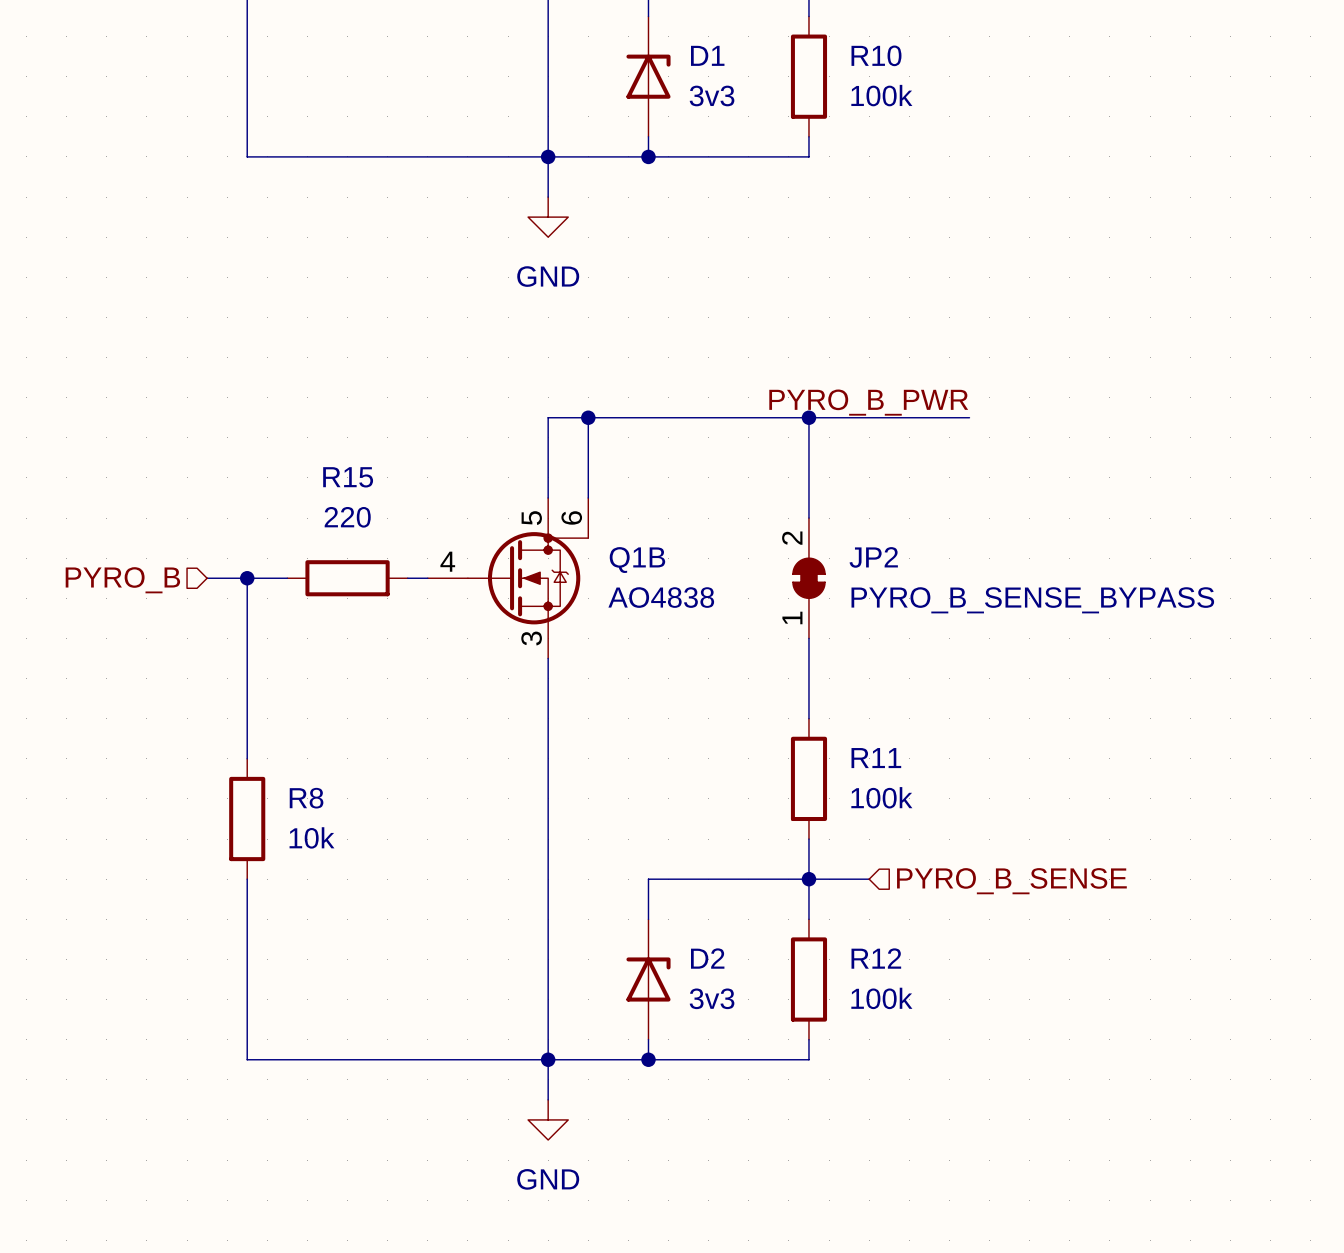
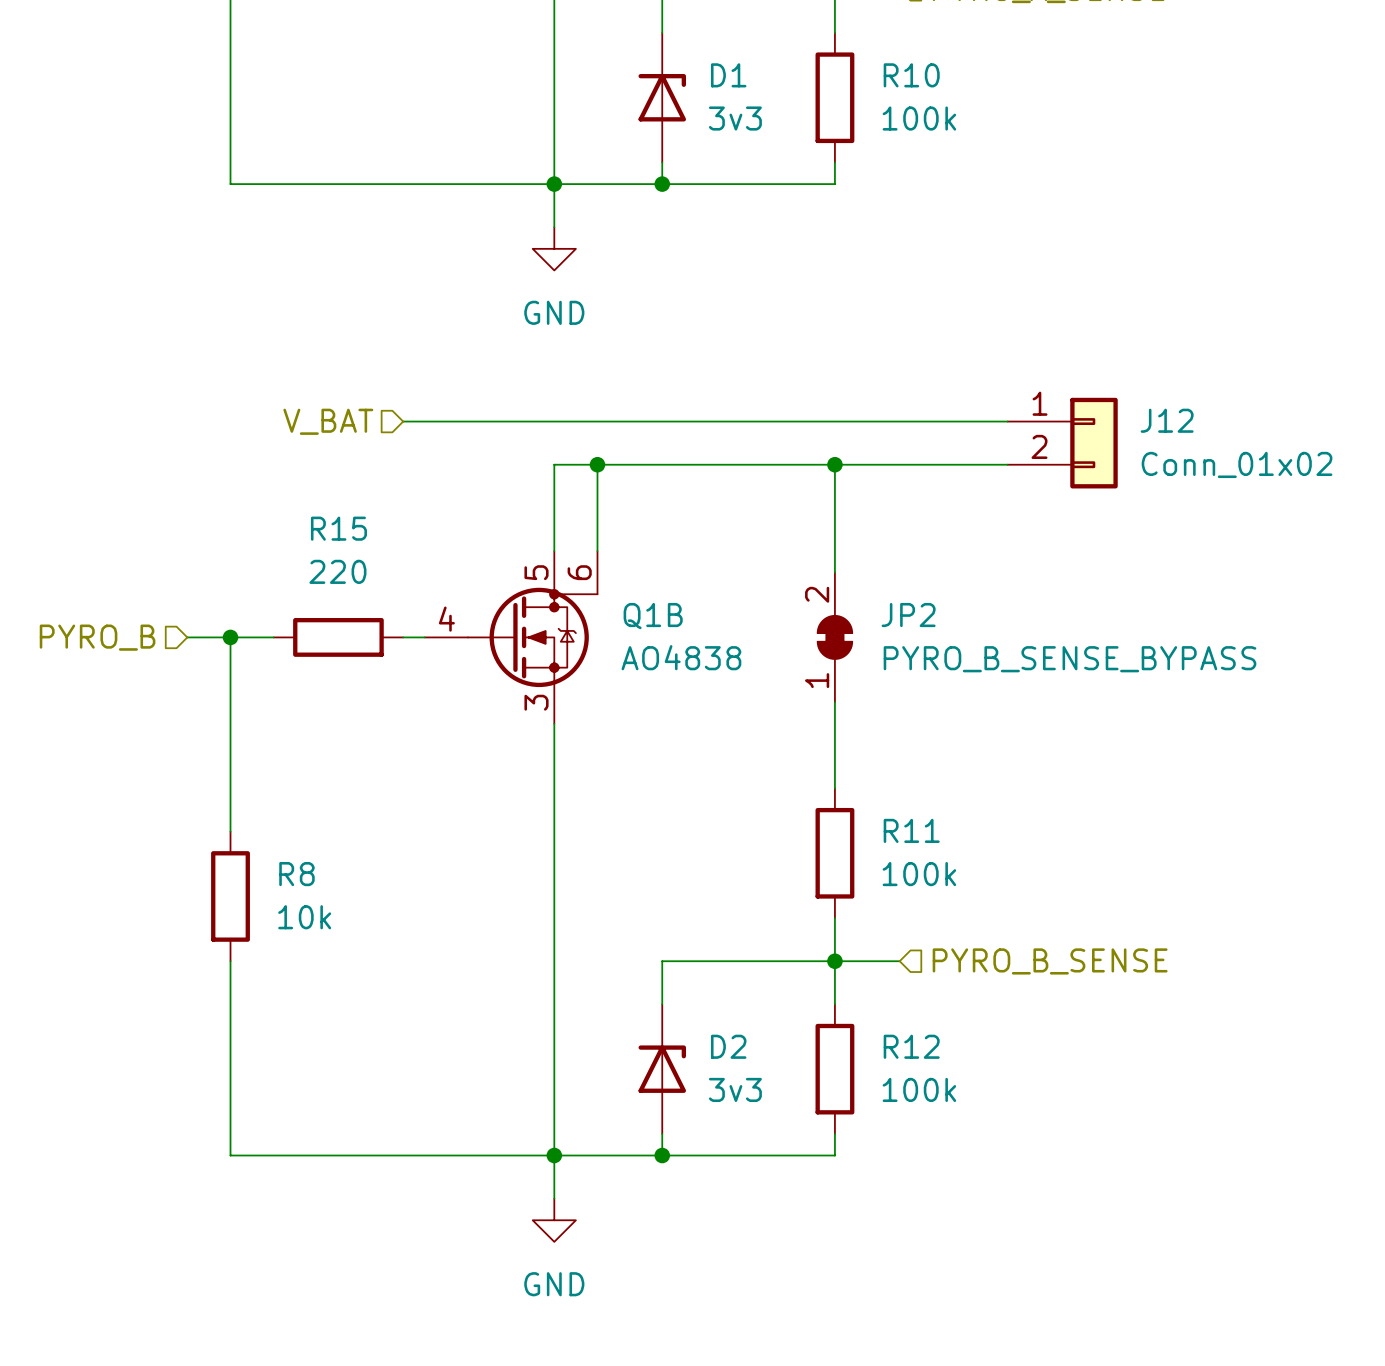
wire: none -> (403, 421) (1007, 421)
hierarchical label: none -> V_BAT (328, 421)
J12: none -> Conn_01x02 (1062, 443)
label: PYRO_B_PWR (868, 402) -> none

